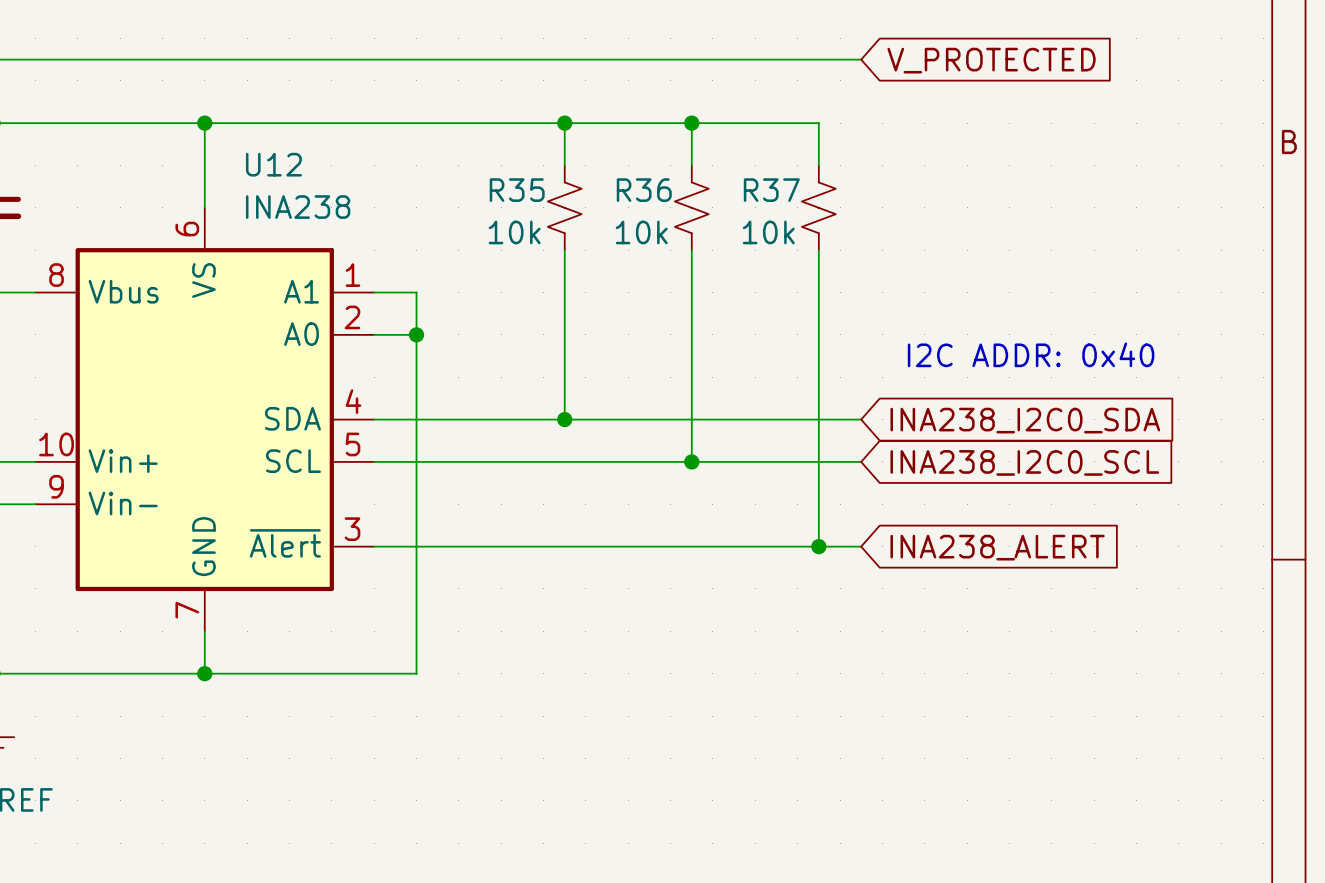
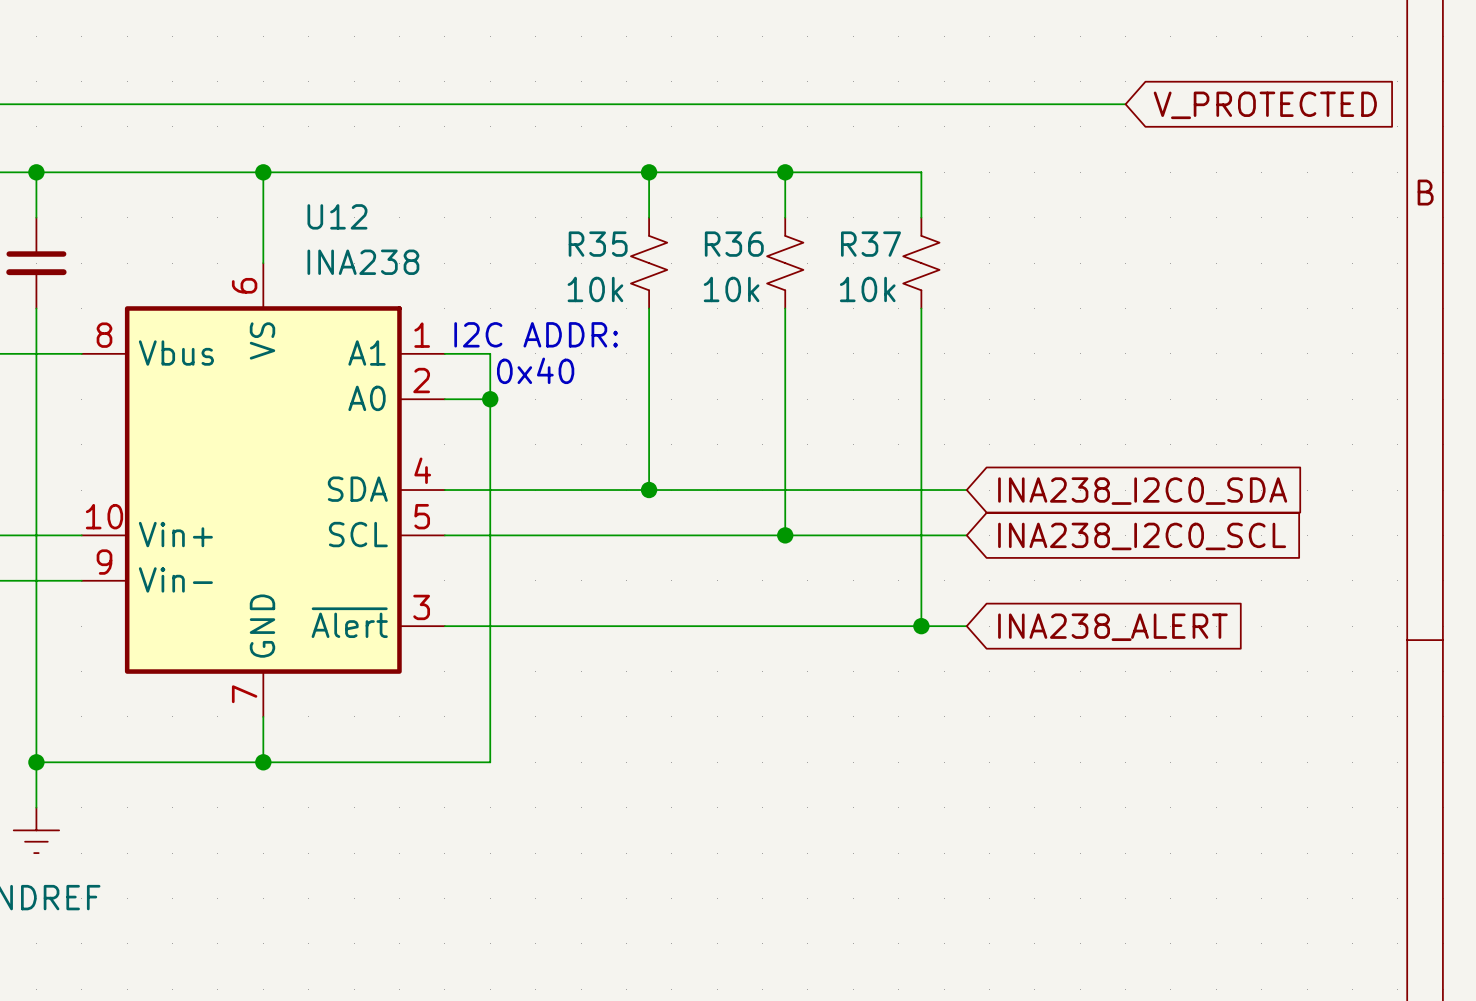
wire: none -> (966, 104) (1125, 104)
global label position: V_PROTECTED (991, 60) -> V_PROTECTED (1265, 105)
text: none -> I2C ADDR: (536, 334)
text: none -> 0x40 (535, 370)
text: I2C ADDR: 0x40 (1031, 354) -> none

